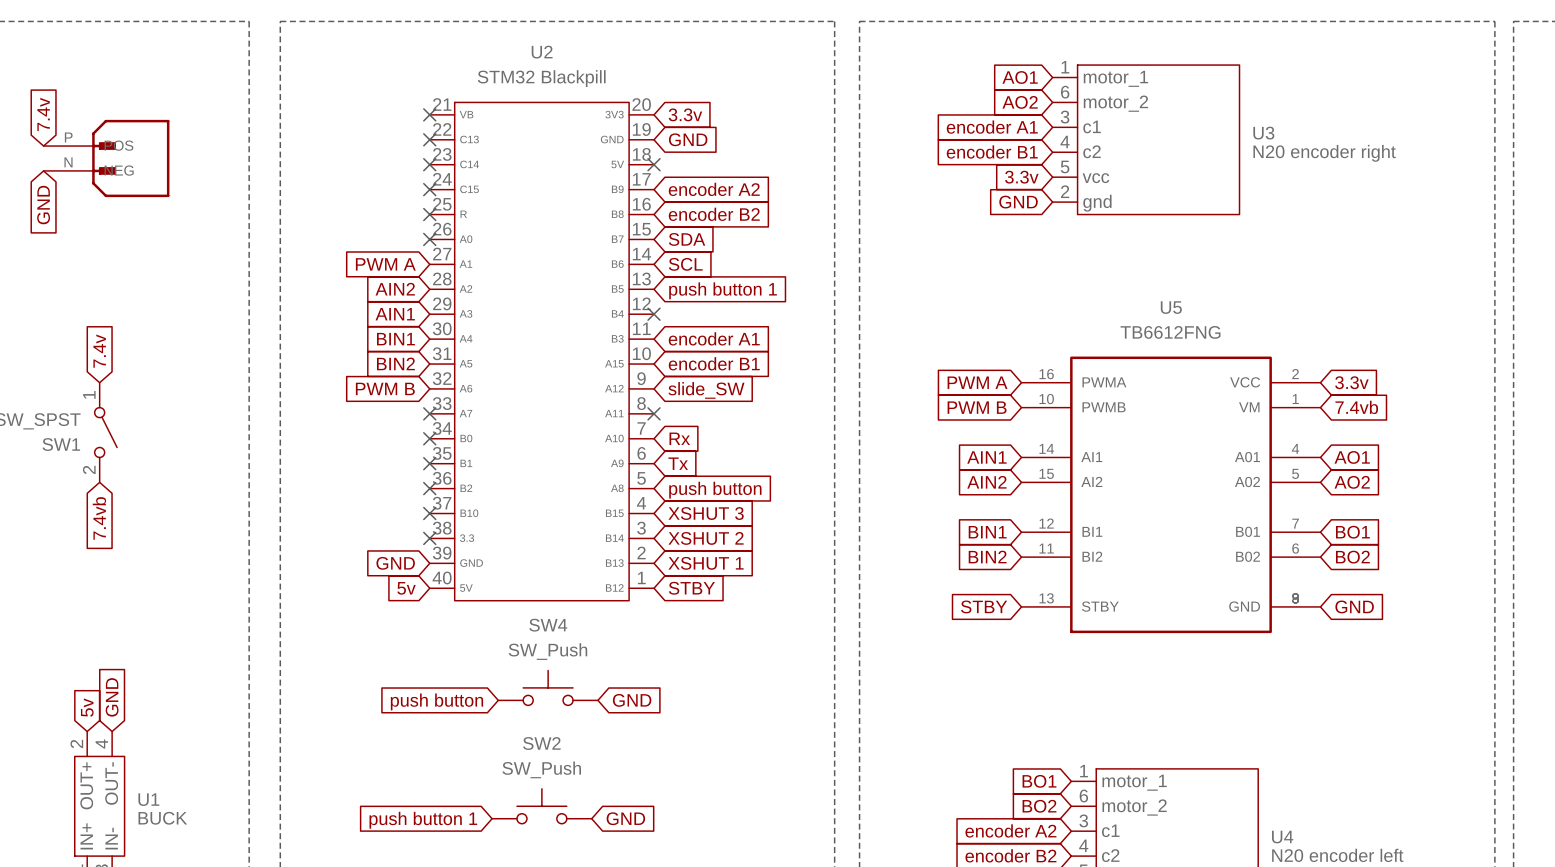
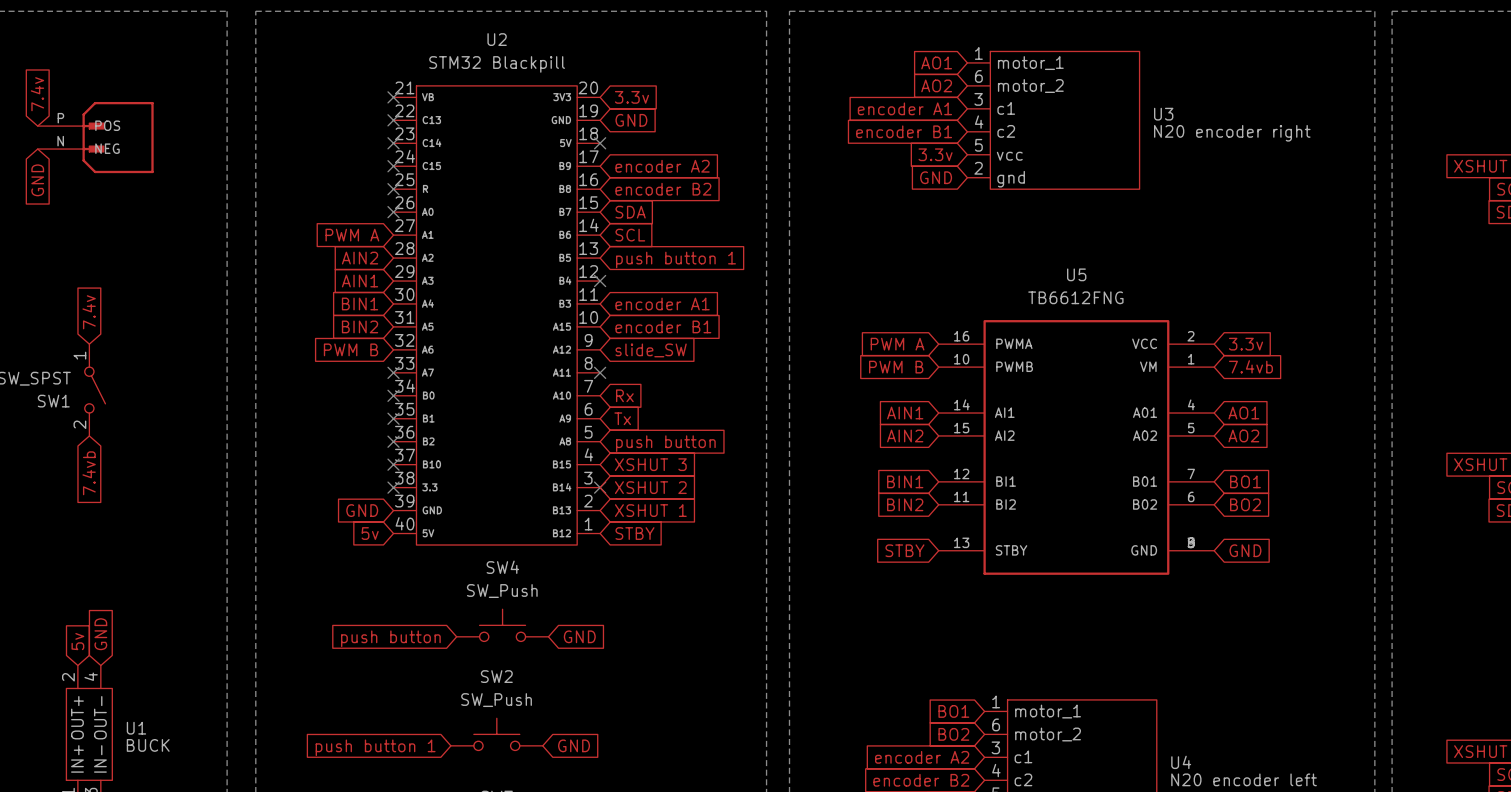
no-connect mark: none -> (600, 487)

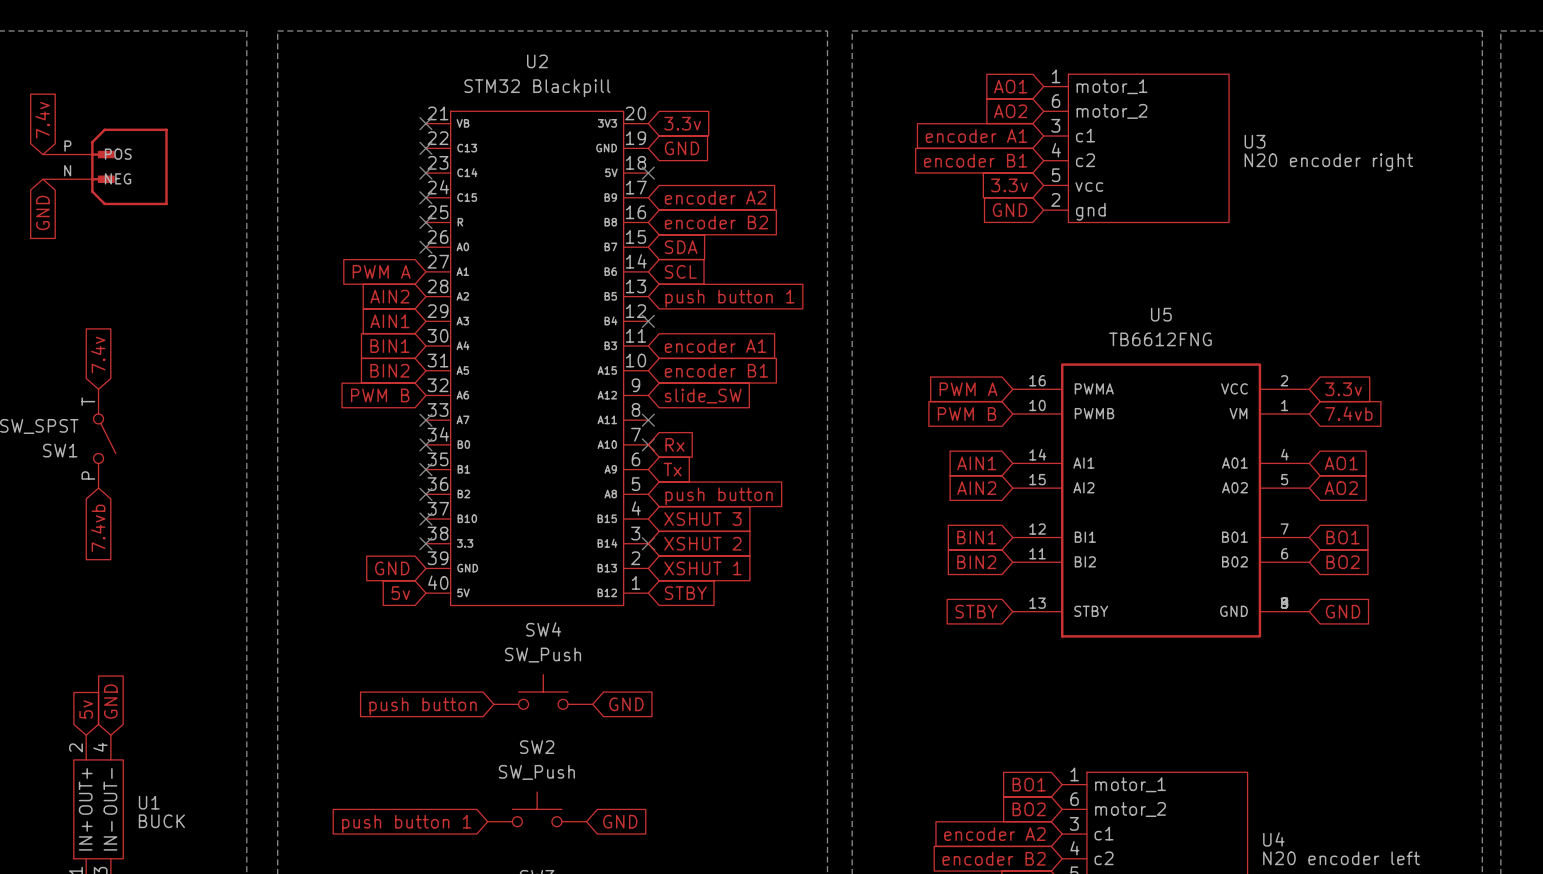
SW1 pin number: 1 (79, 355) -> T (88, 401)
no-connect mark: none -> (648, 444)
SW1 pin number: 2 (79, 424) -> P (88, 475)

